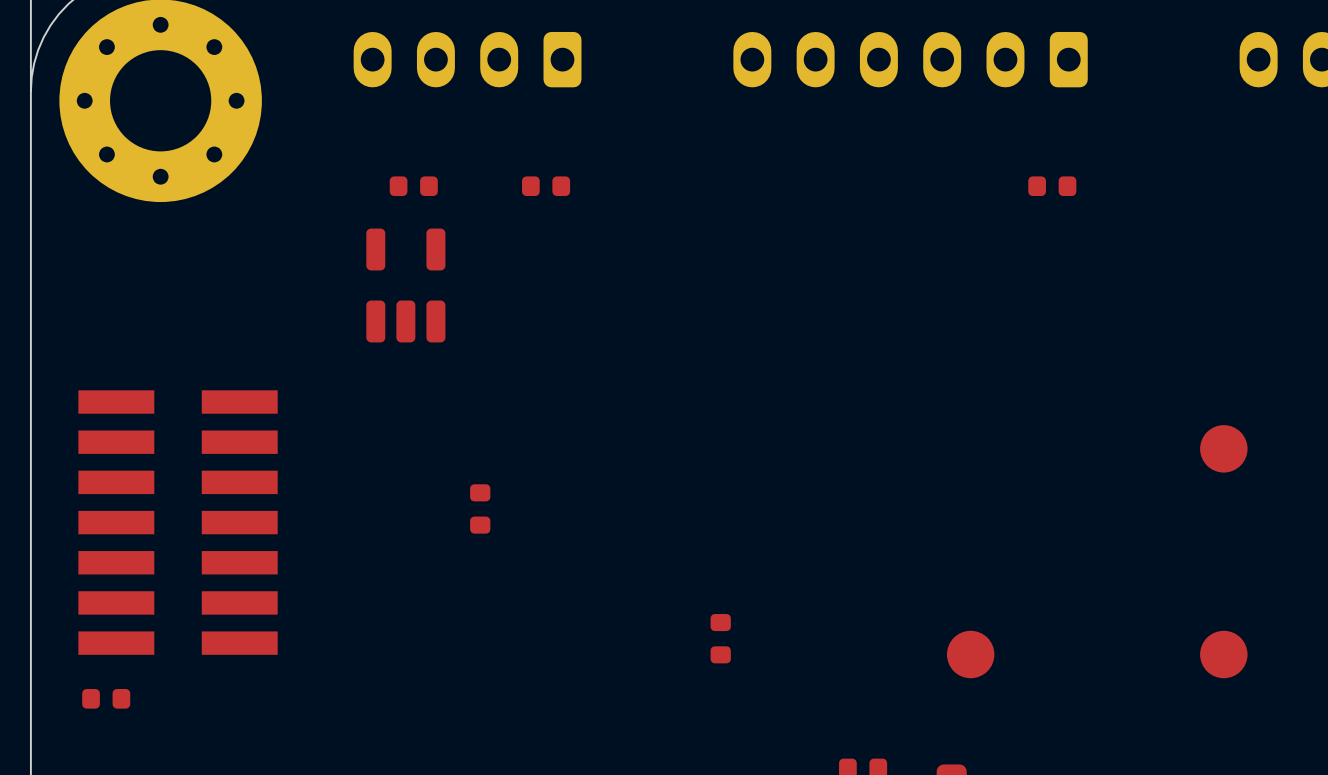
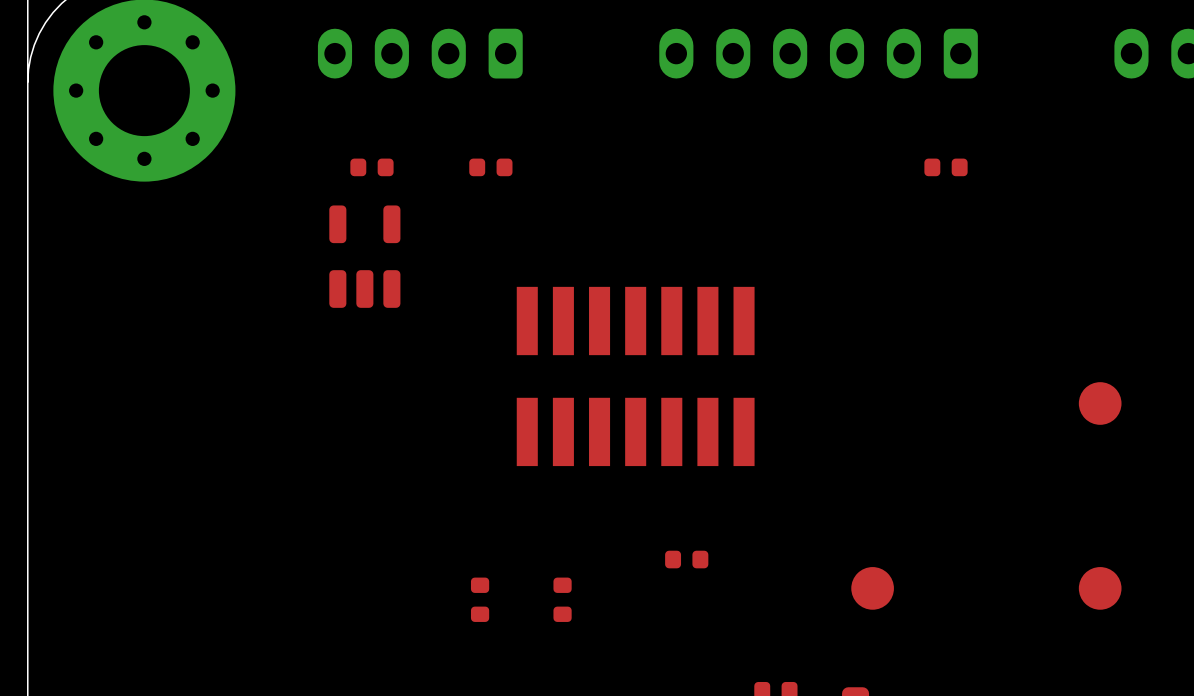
part: (480, 508) -> none
part rotation: 0° (178, 522) -> 90° clockwise (635, 376)
part position: (178, 522) -> (635, 376)
part: (720, 638) -> none
part: none -> (480, 599)
part: none -> (562, 599)
part position: (106, 698) -> (686, 559)

